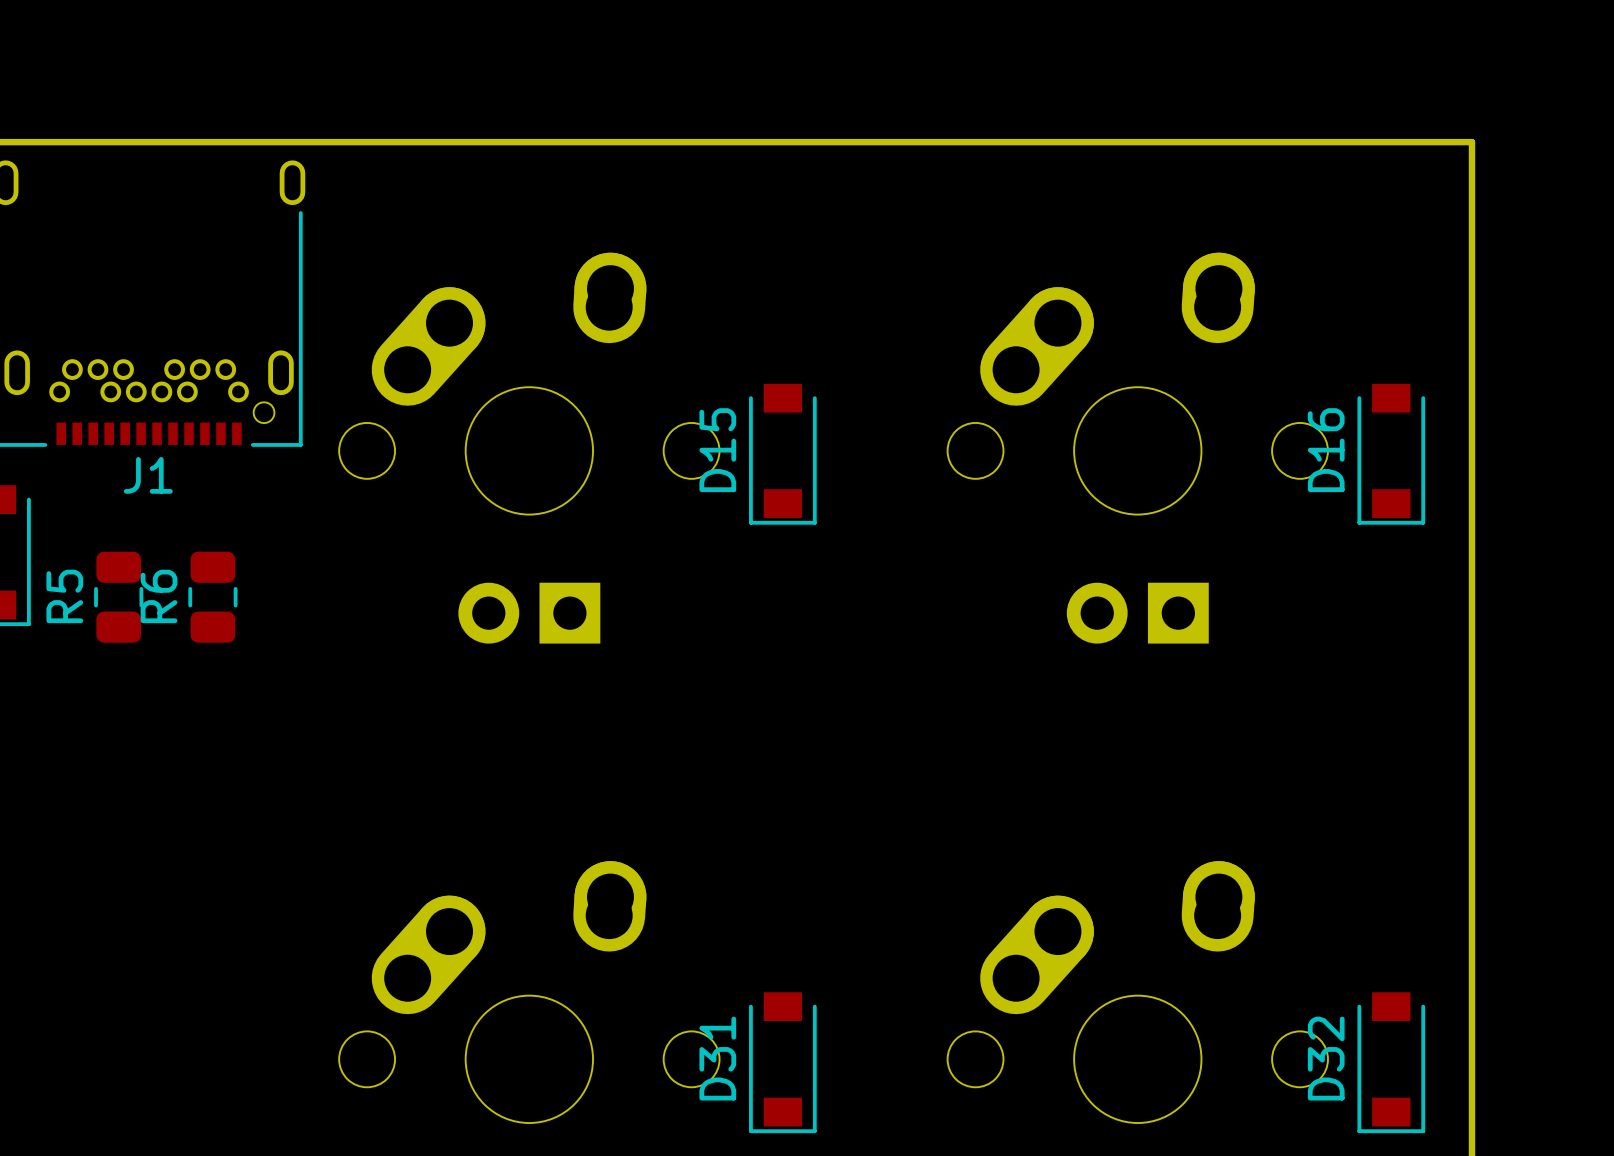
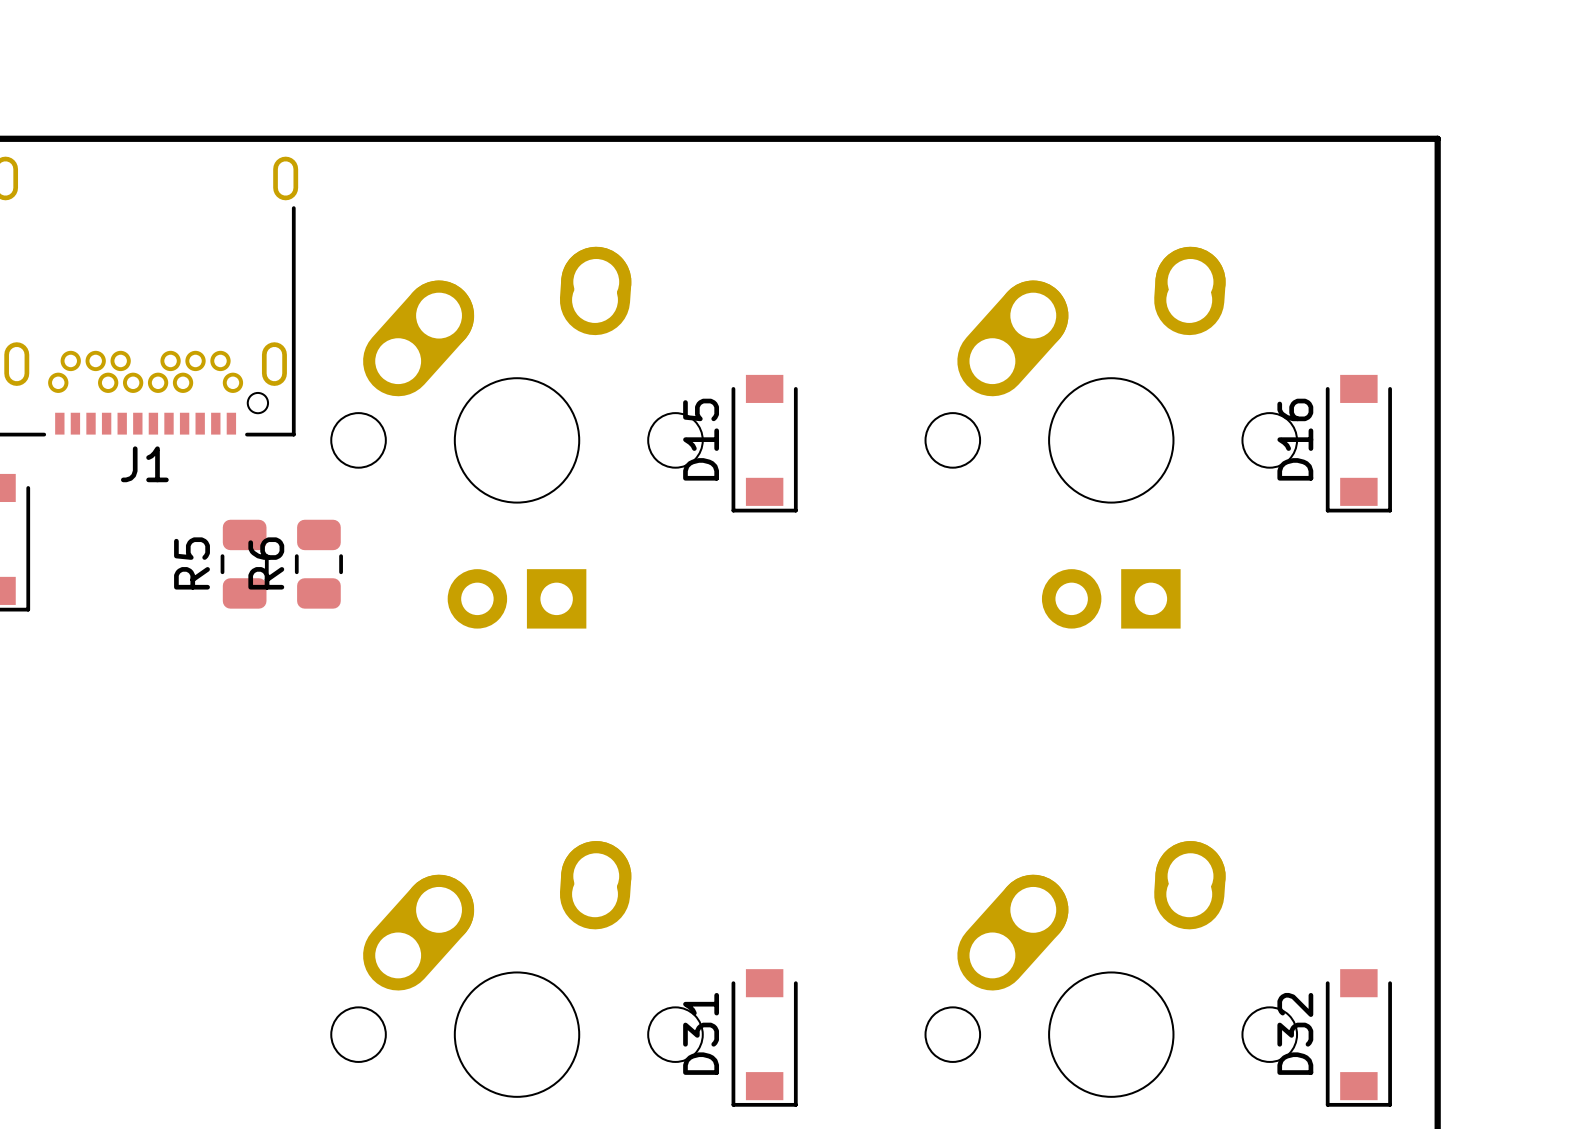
R5 position: (118, 597) -> (244, 564)
R6 position: (212, 597) -> (318, 564)

